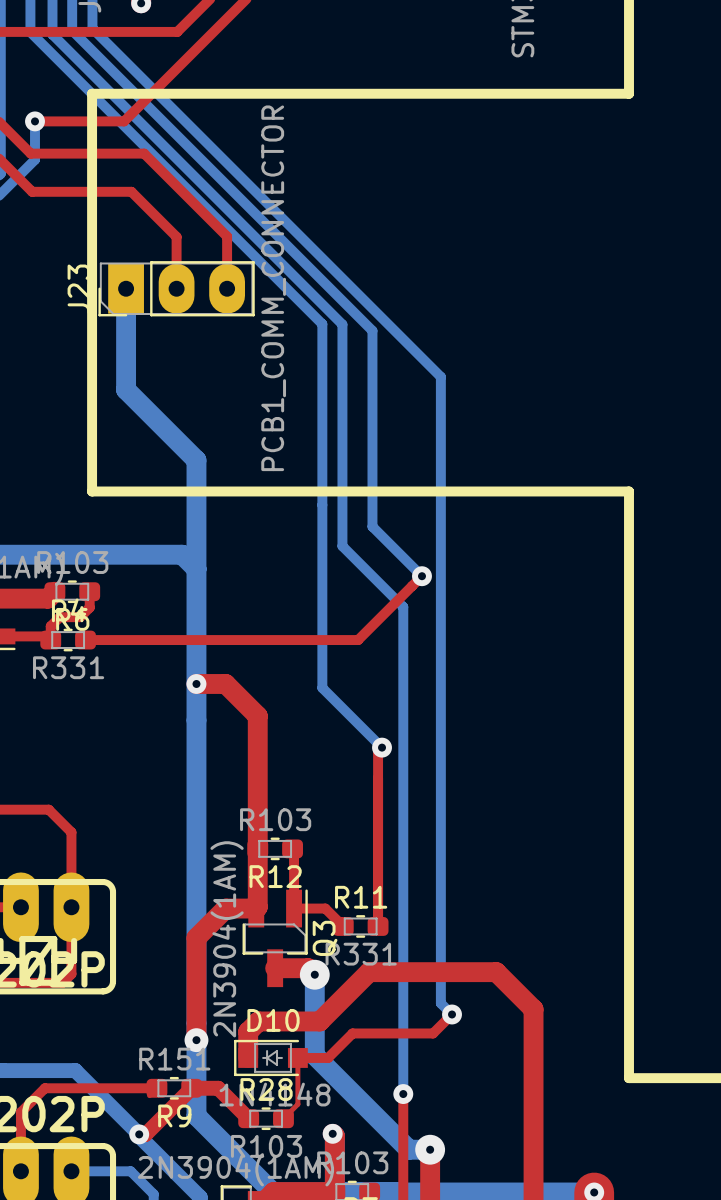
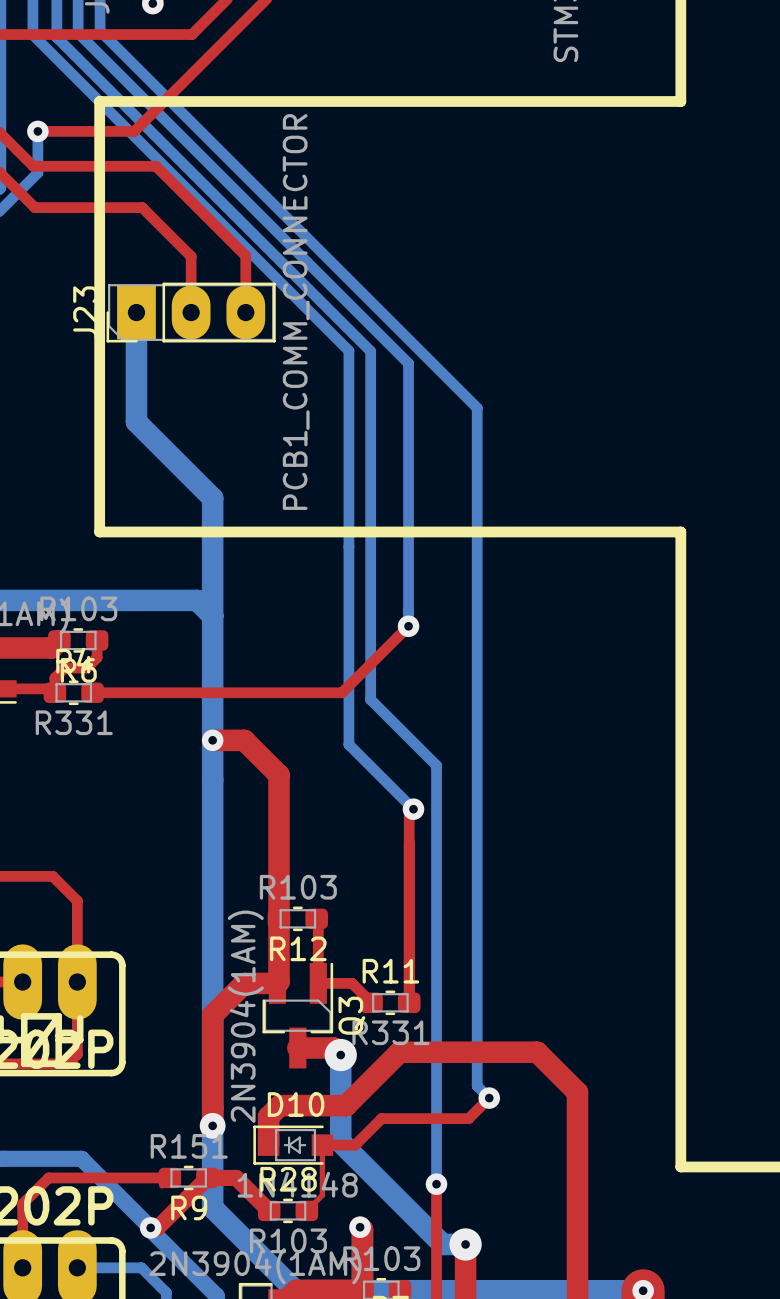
bottom track: (372, 330) (372, 526) (421, 576) -> (403, 358) (408, 363) (408, 626)
bottom track: (342, 546) (403, 607) (403, 707) -> (370, 591) (370, 699) (436, 765)
top track: (421, 576) (358, 640) (315, 640) -> (408, 626) (342, 692)
via position: (421, 576) -> (408, 626)

